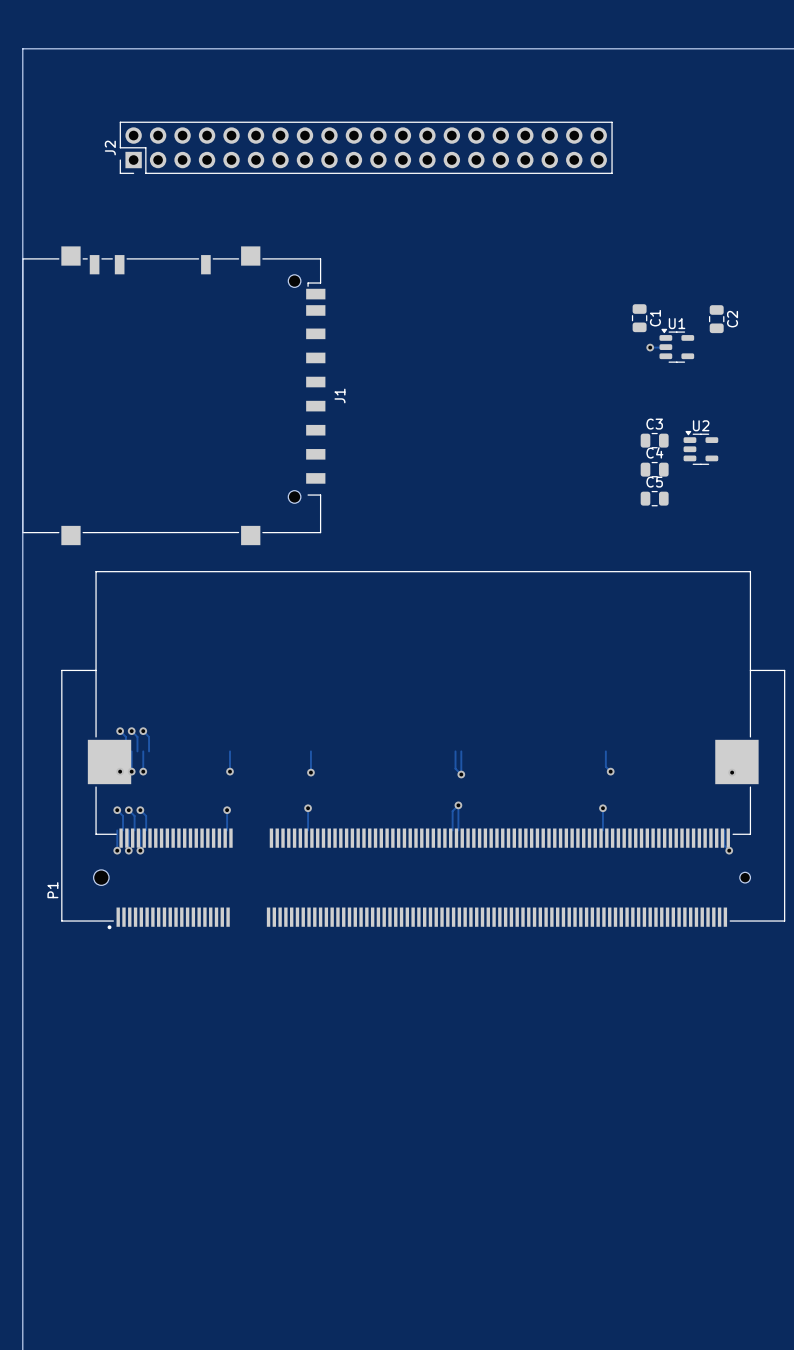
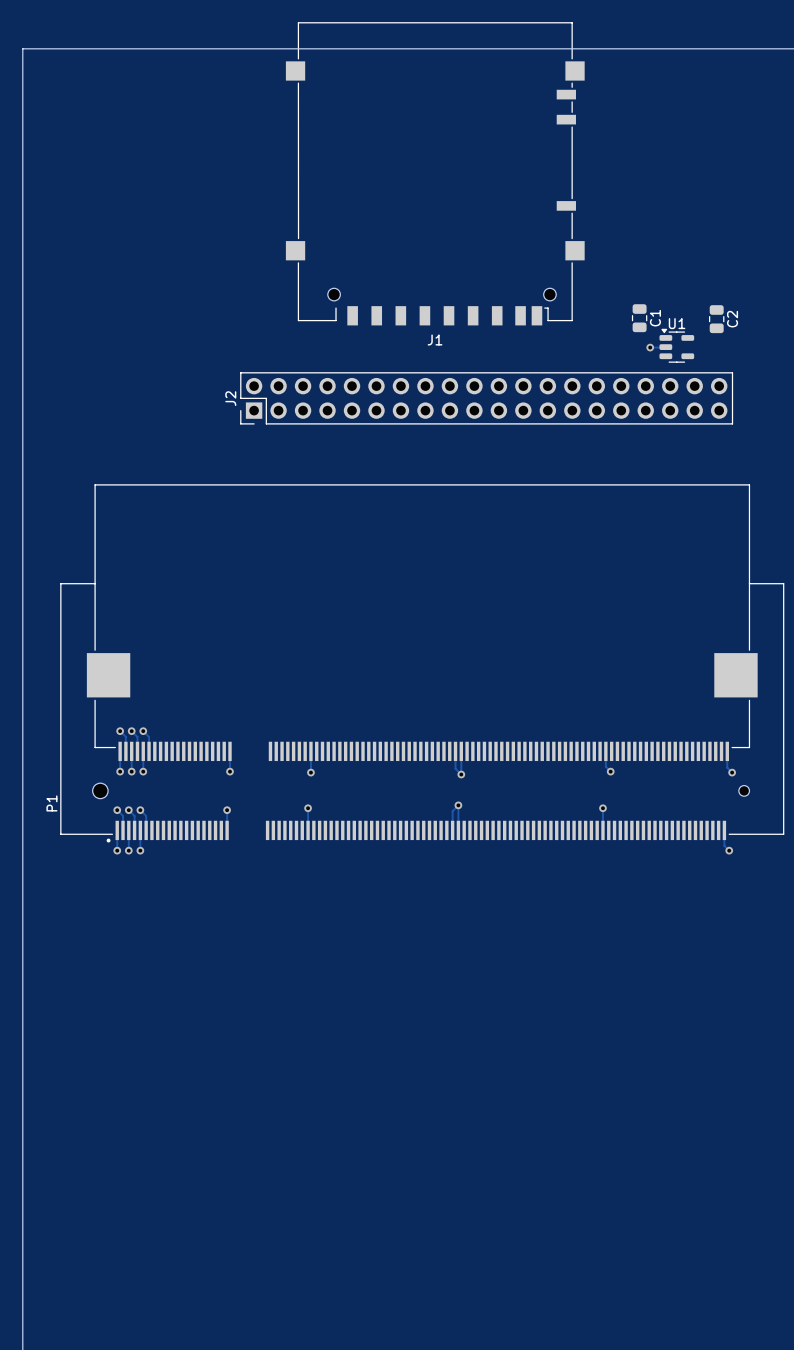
J2 position: (366, 147) -> (486, 398)
J1 rotation: 0° (173, 395) -> 90° clockwise (435, 173)
J1 position: (173, 395) -> (435, 173)
C3: (654, 440) -> none
U2: (700, 447) -> none
C4: (654, 469) -> none
C5: (654, 498) -> none
P1 position: (423, 750) -> (422, 663)

